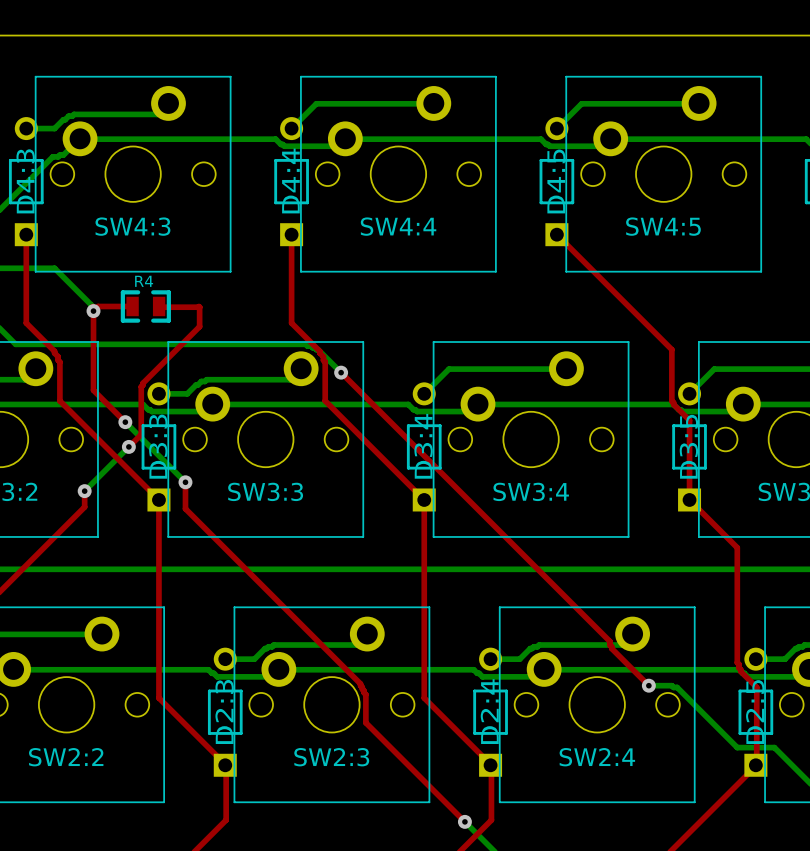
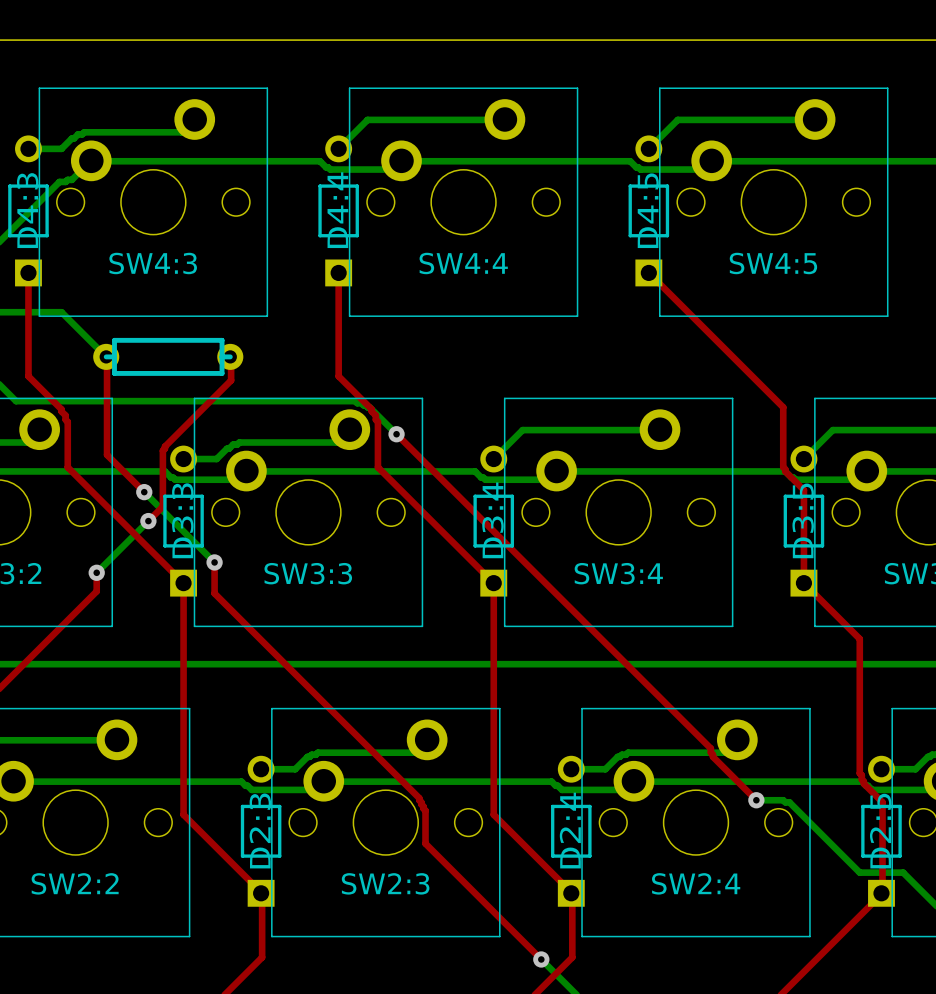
top track: (132, 306) (98, 306) (93, 311) -> none
R4: (145, 306) -> none
part: none -> (168, 356)
top track: (159, 306) (199, 307) -> none
via: (93, 311) -> none

